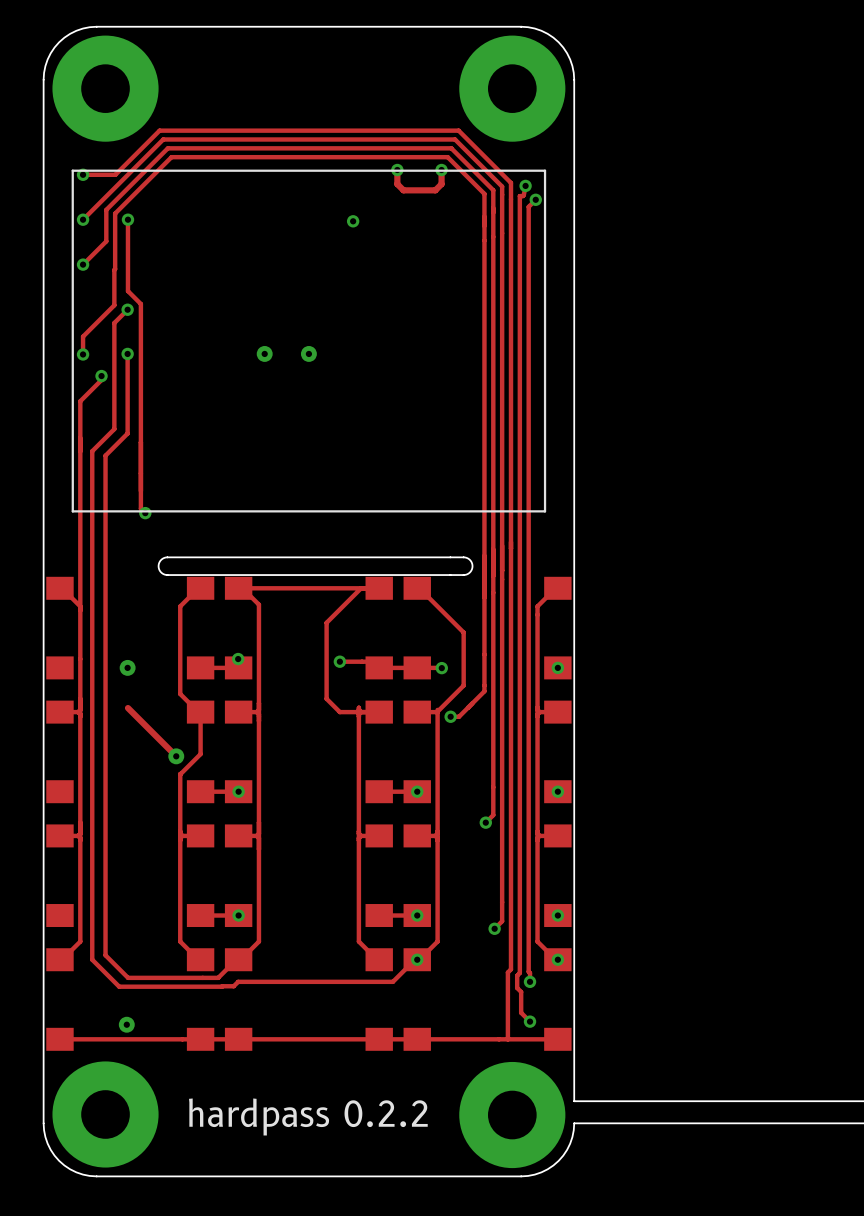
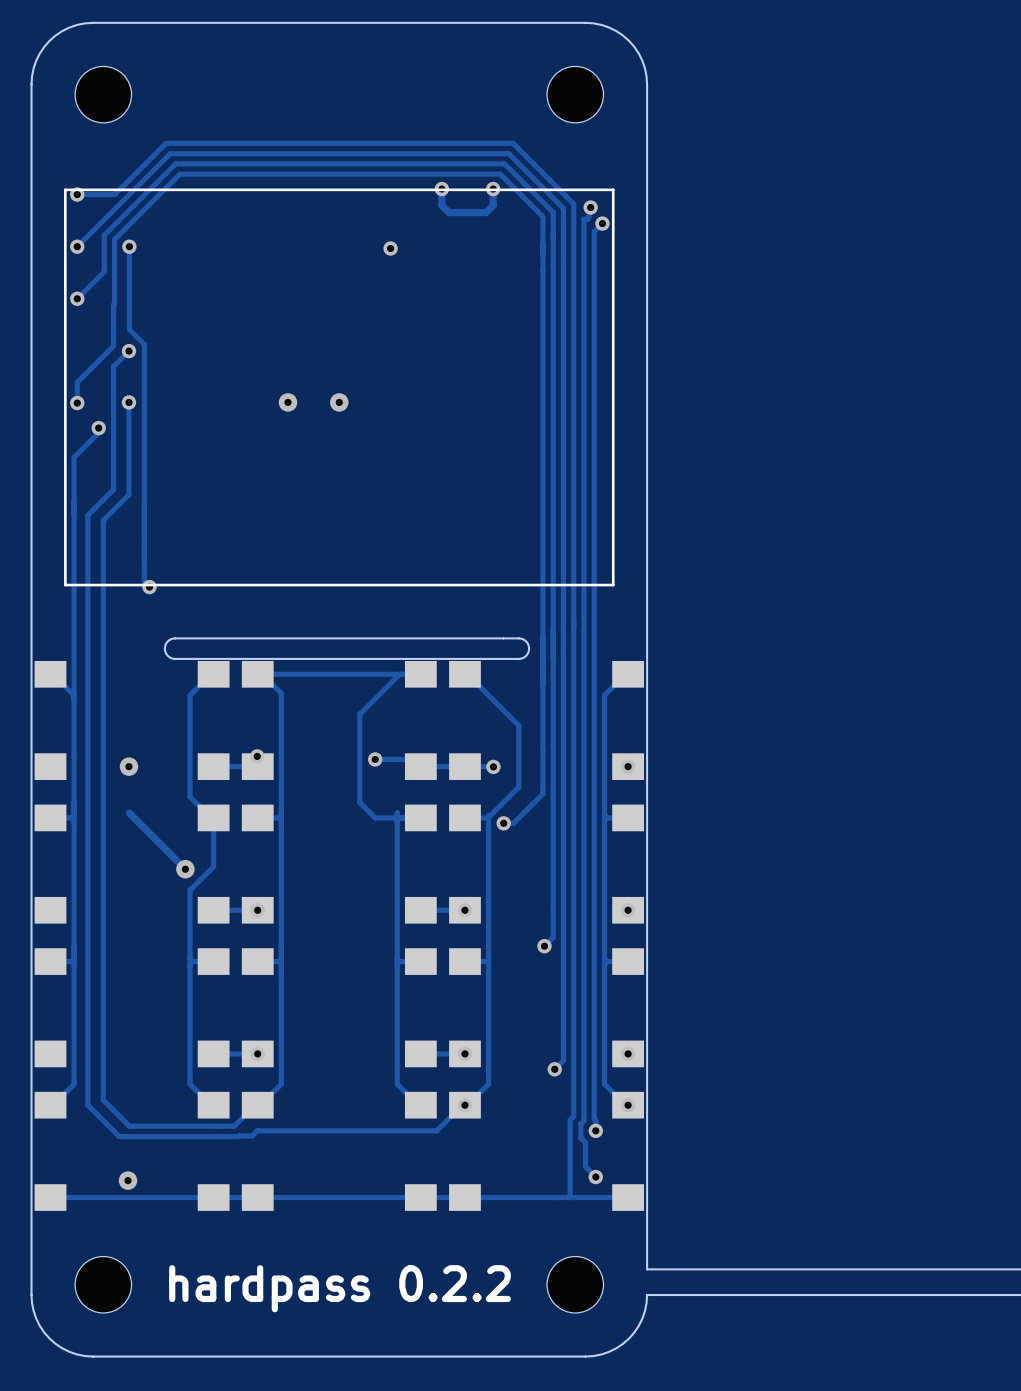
part footprint: [52, 35, 159, 142] -> [75, 66, 132, 123]
part footprint: [459, 35, 566, 142] -> [547, 66, 604, 123]
part footprint: [52, 1061, 159, 1168] -> [75, 1256, 132, 1313]
part footprint: [459, 1061, 566, 1169] -> [547, 1256, 604, 1313]

